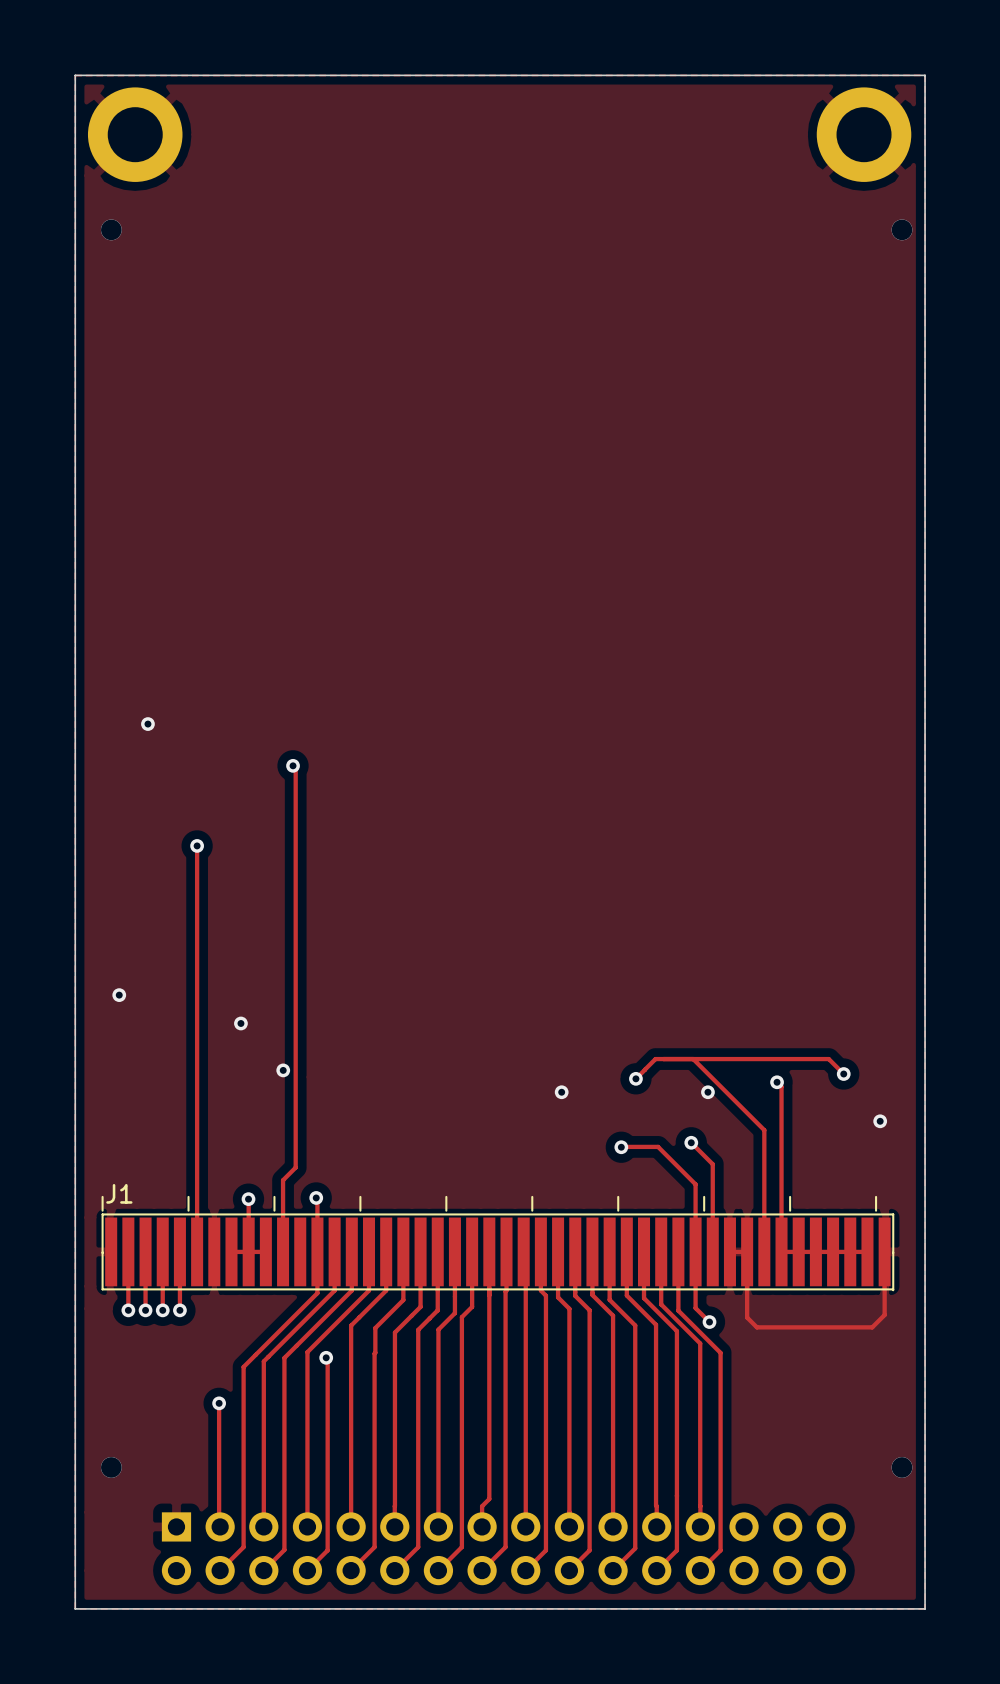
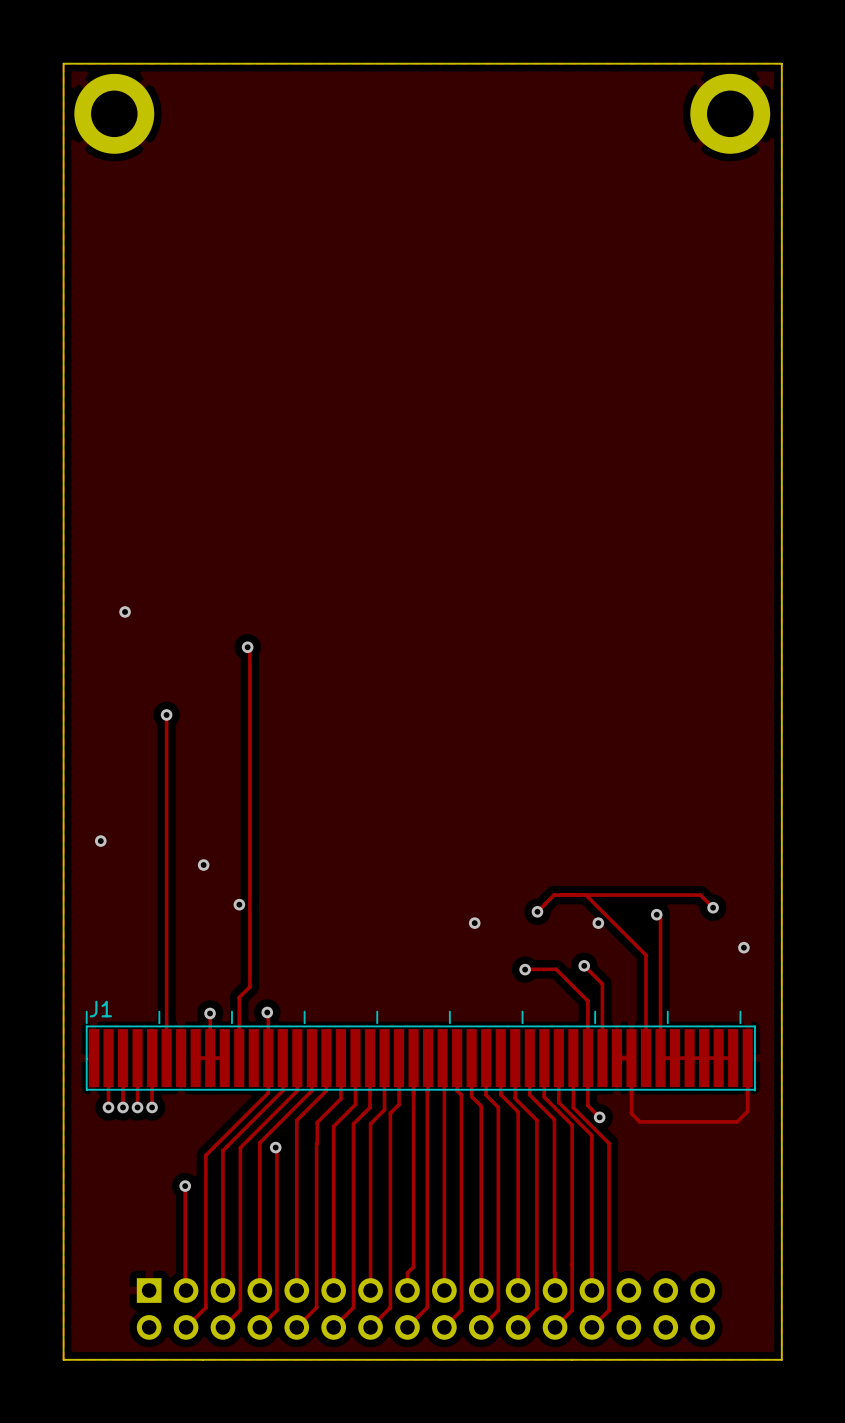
via: (111, 229) -> none
via: (902, 229) -> none
via: (111, 1467) -> none
via: (902, 1467) -> none

